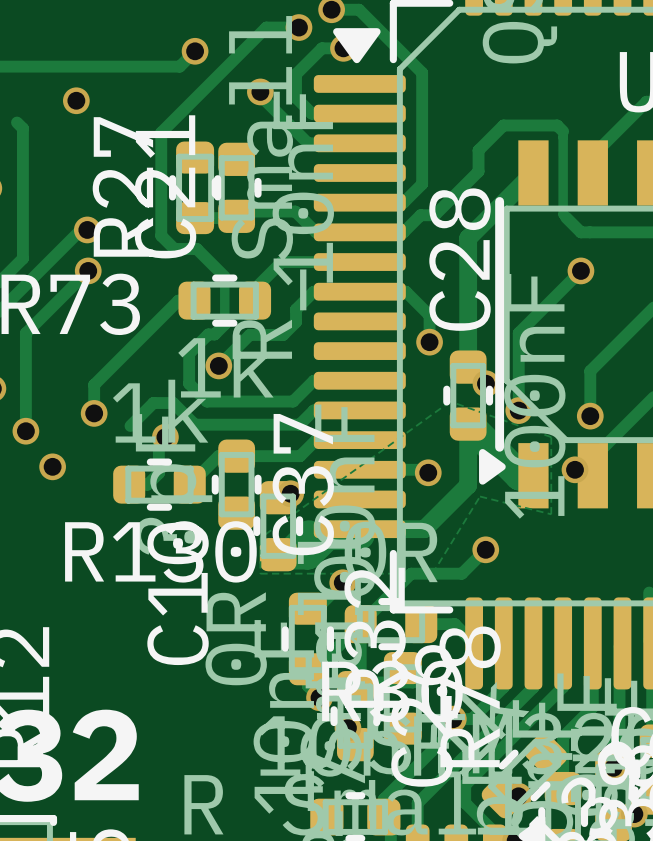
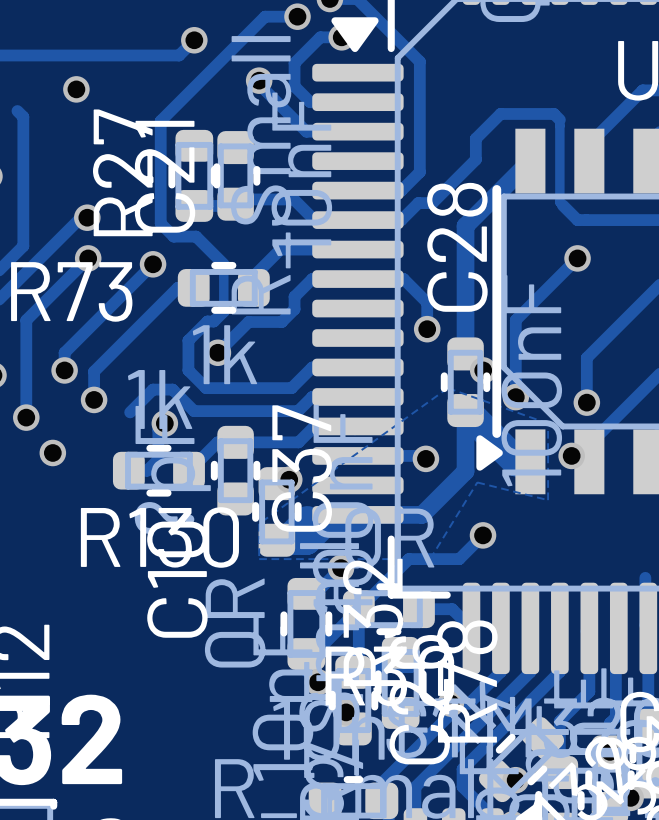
track: none -> (153, 264) (64, 352) (64, 370)
via: none -> (153, 264)
via: none -> (64, 370)

